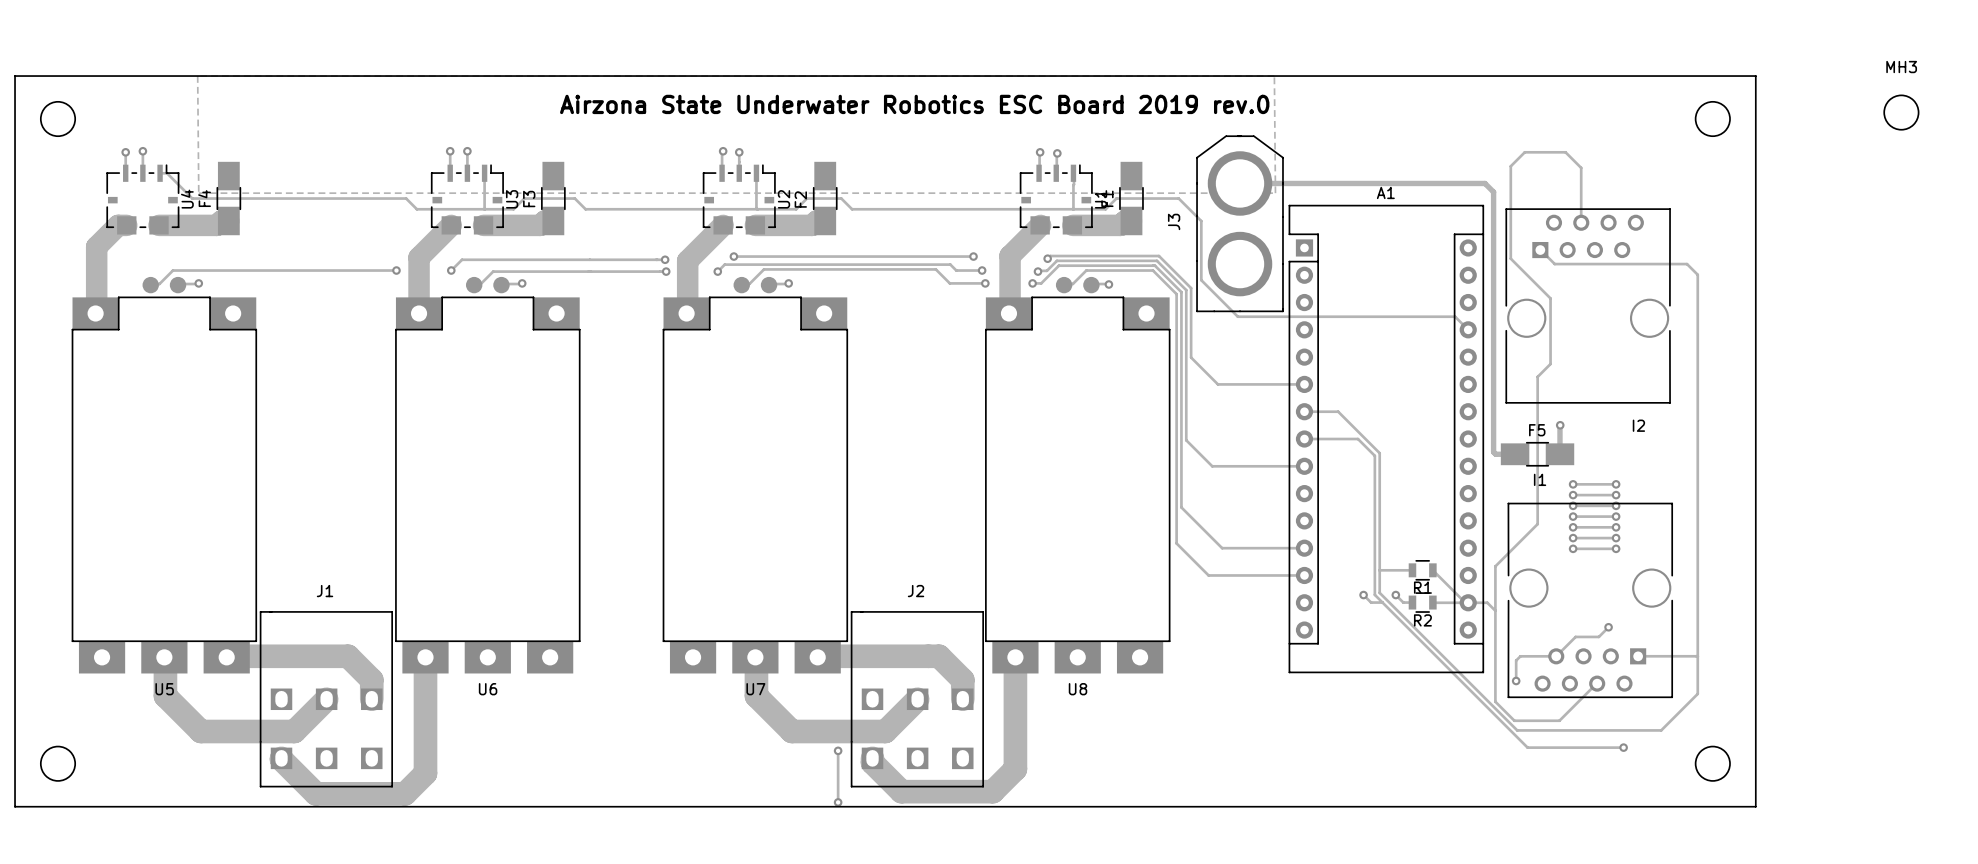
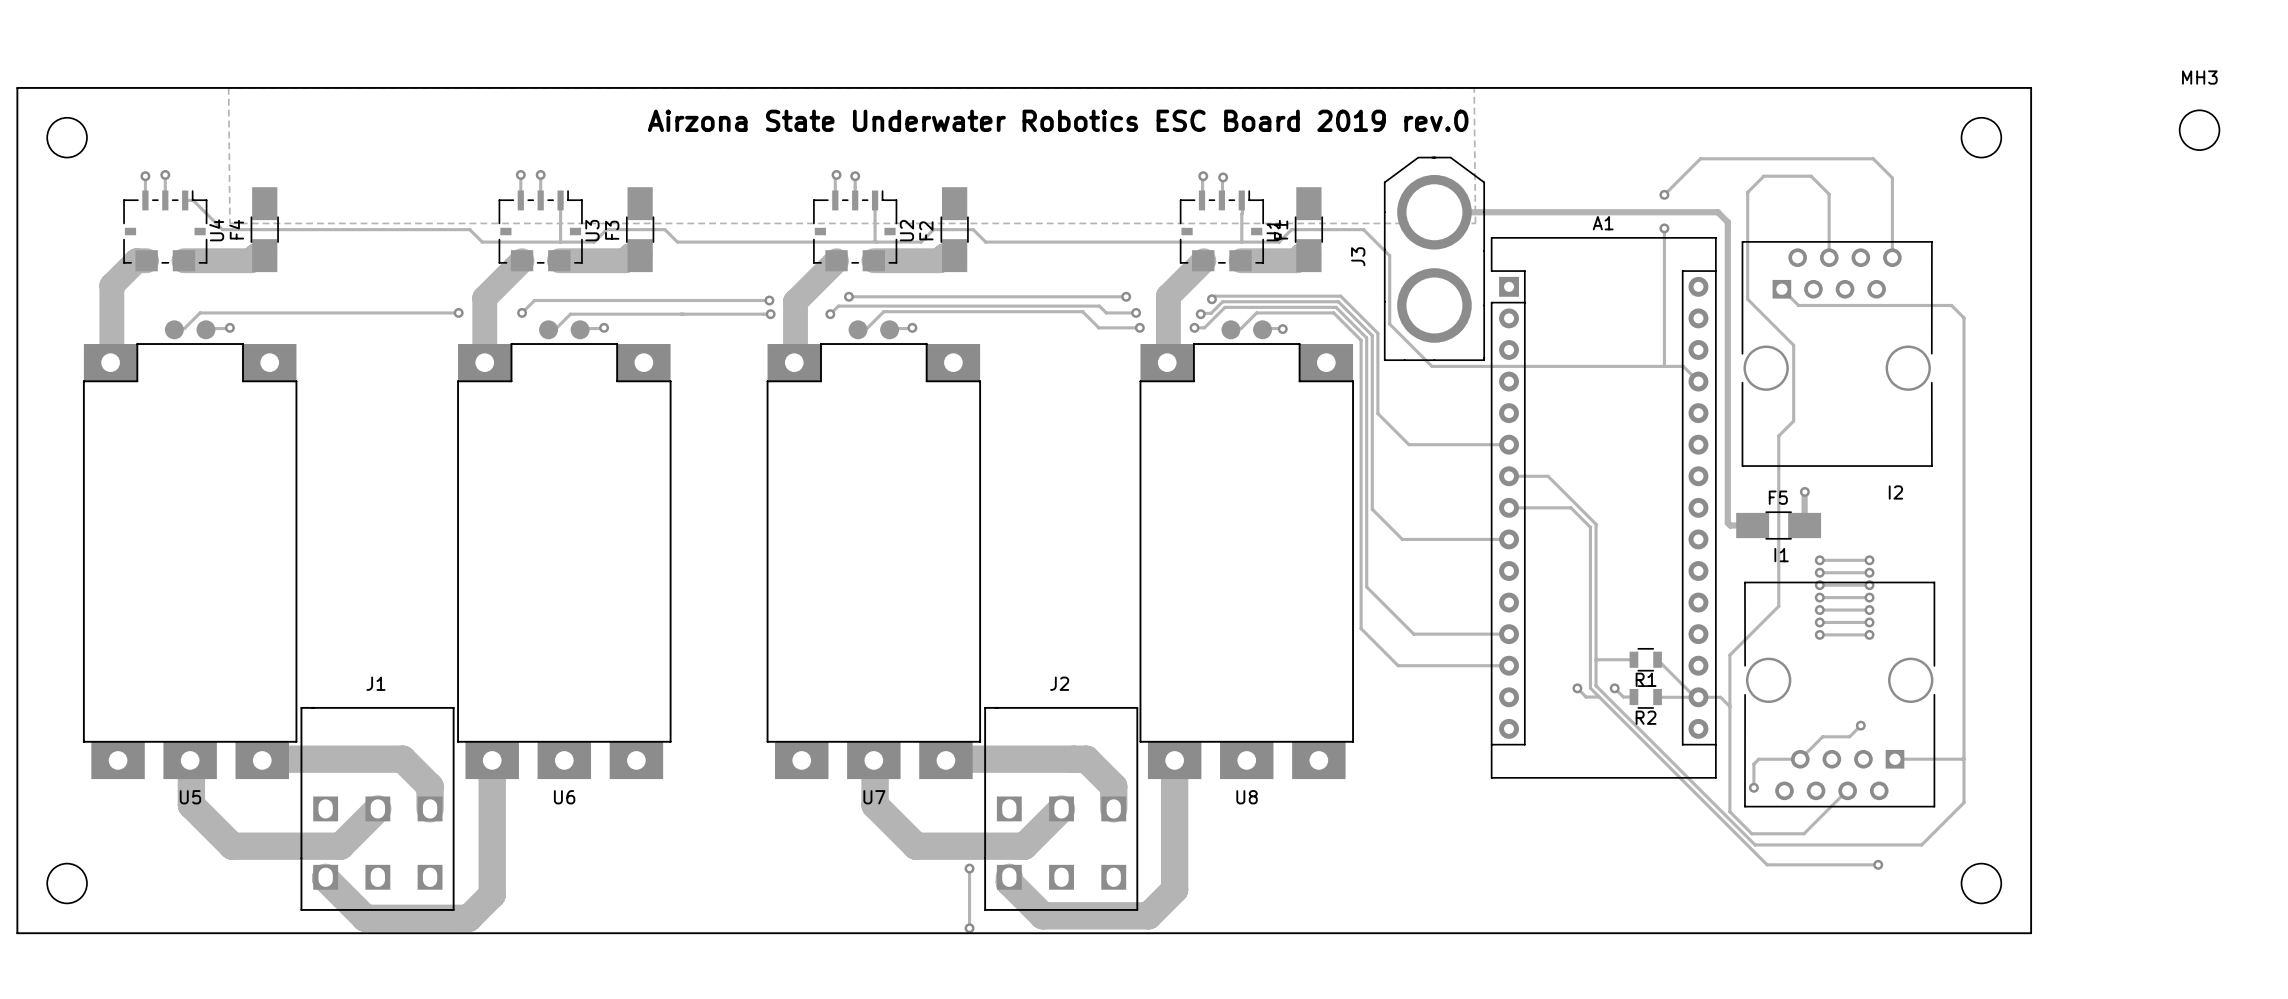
track: none -> (1664, 194) (1700, 158) (1873, 158) (1892, 177) (1892, 257)
via: none -> (1664, 194)
track: none -> (1664, 228) (1664, 366)
via: none -> (1664, 228)

